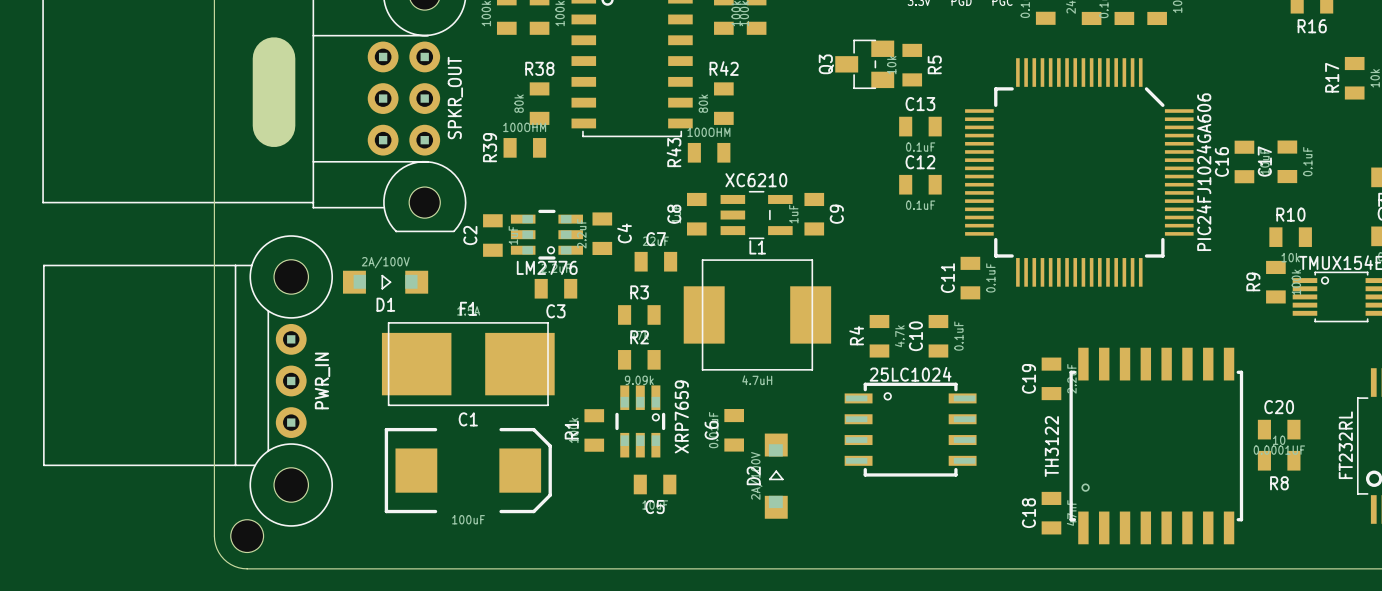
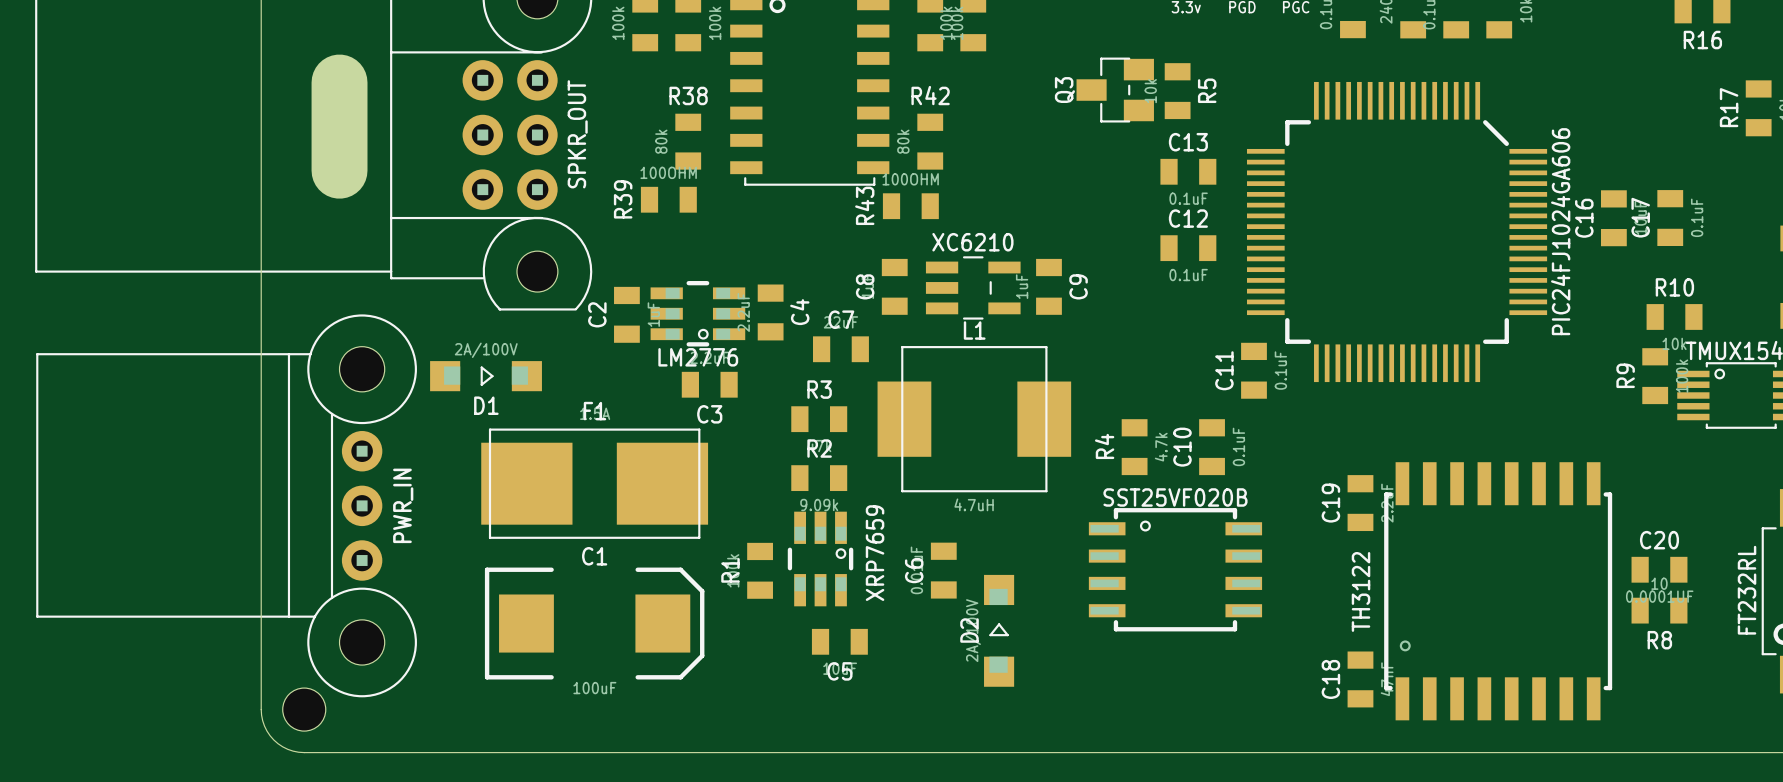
25LC1024 name: 25LC1024 (910, 374) -> SST25VF020B (1175, 497)

